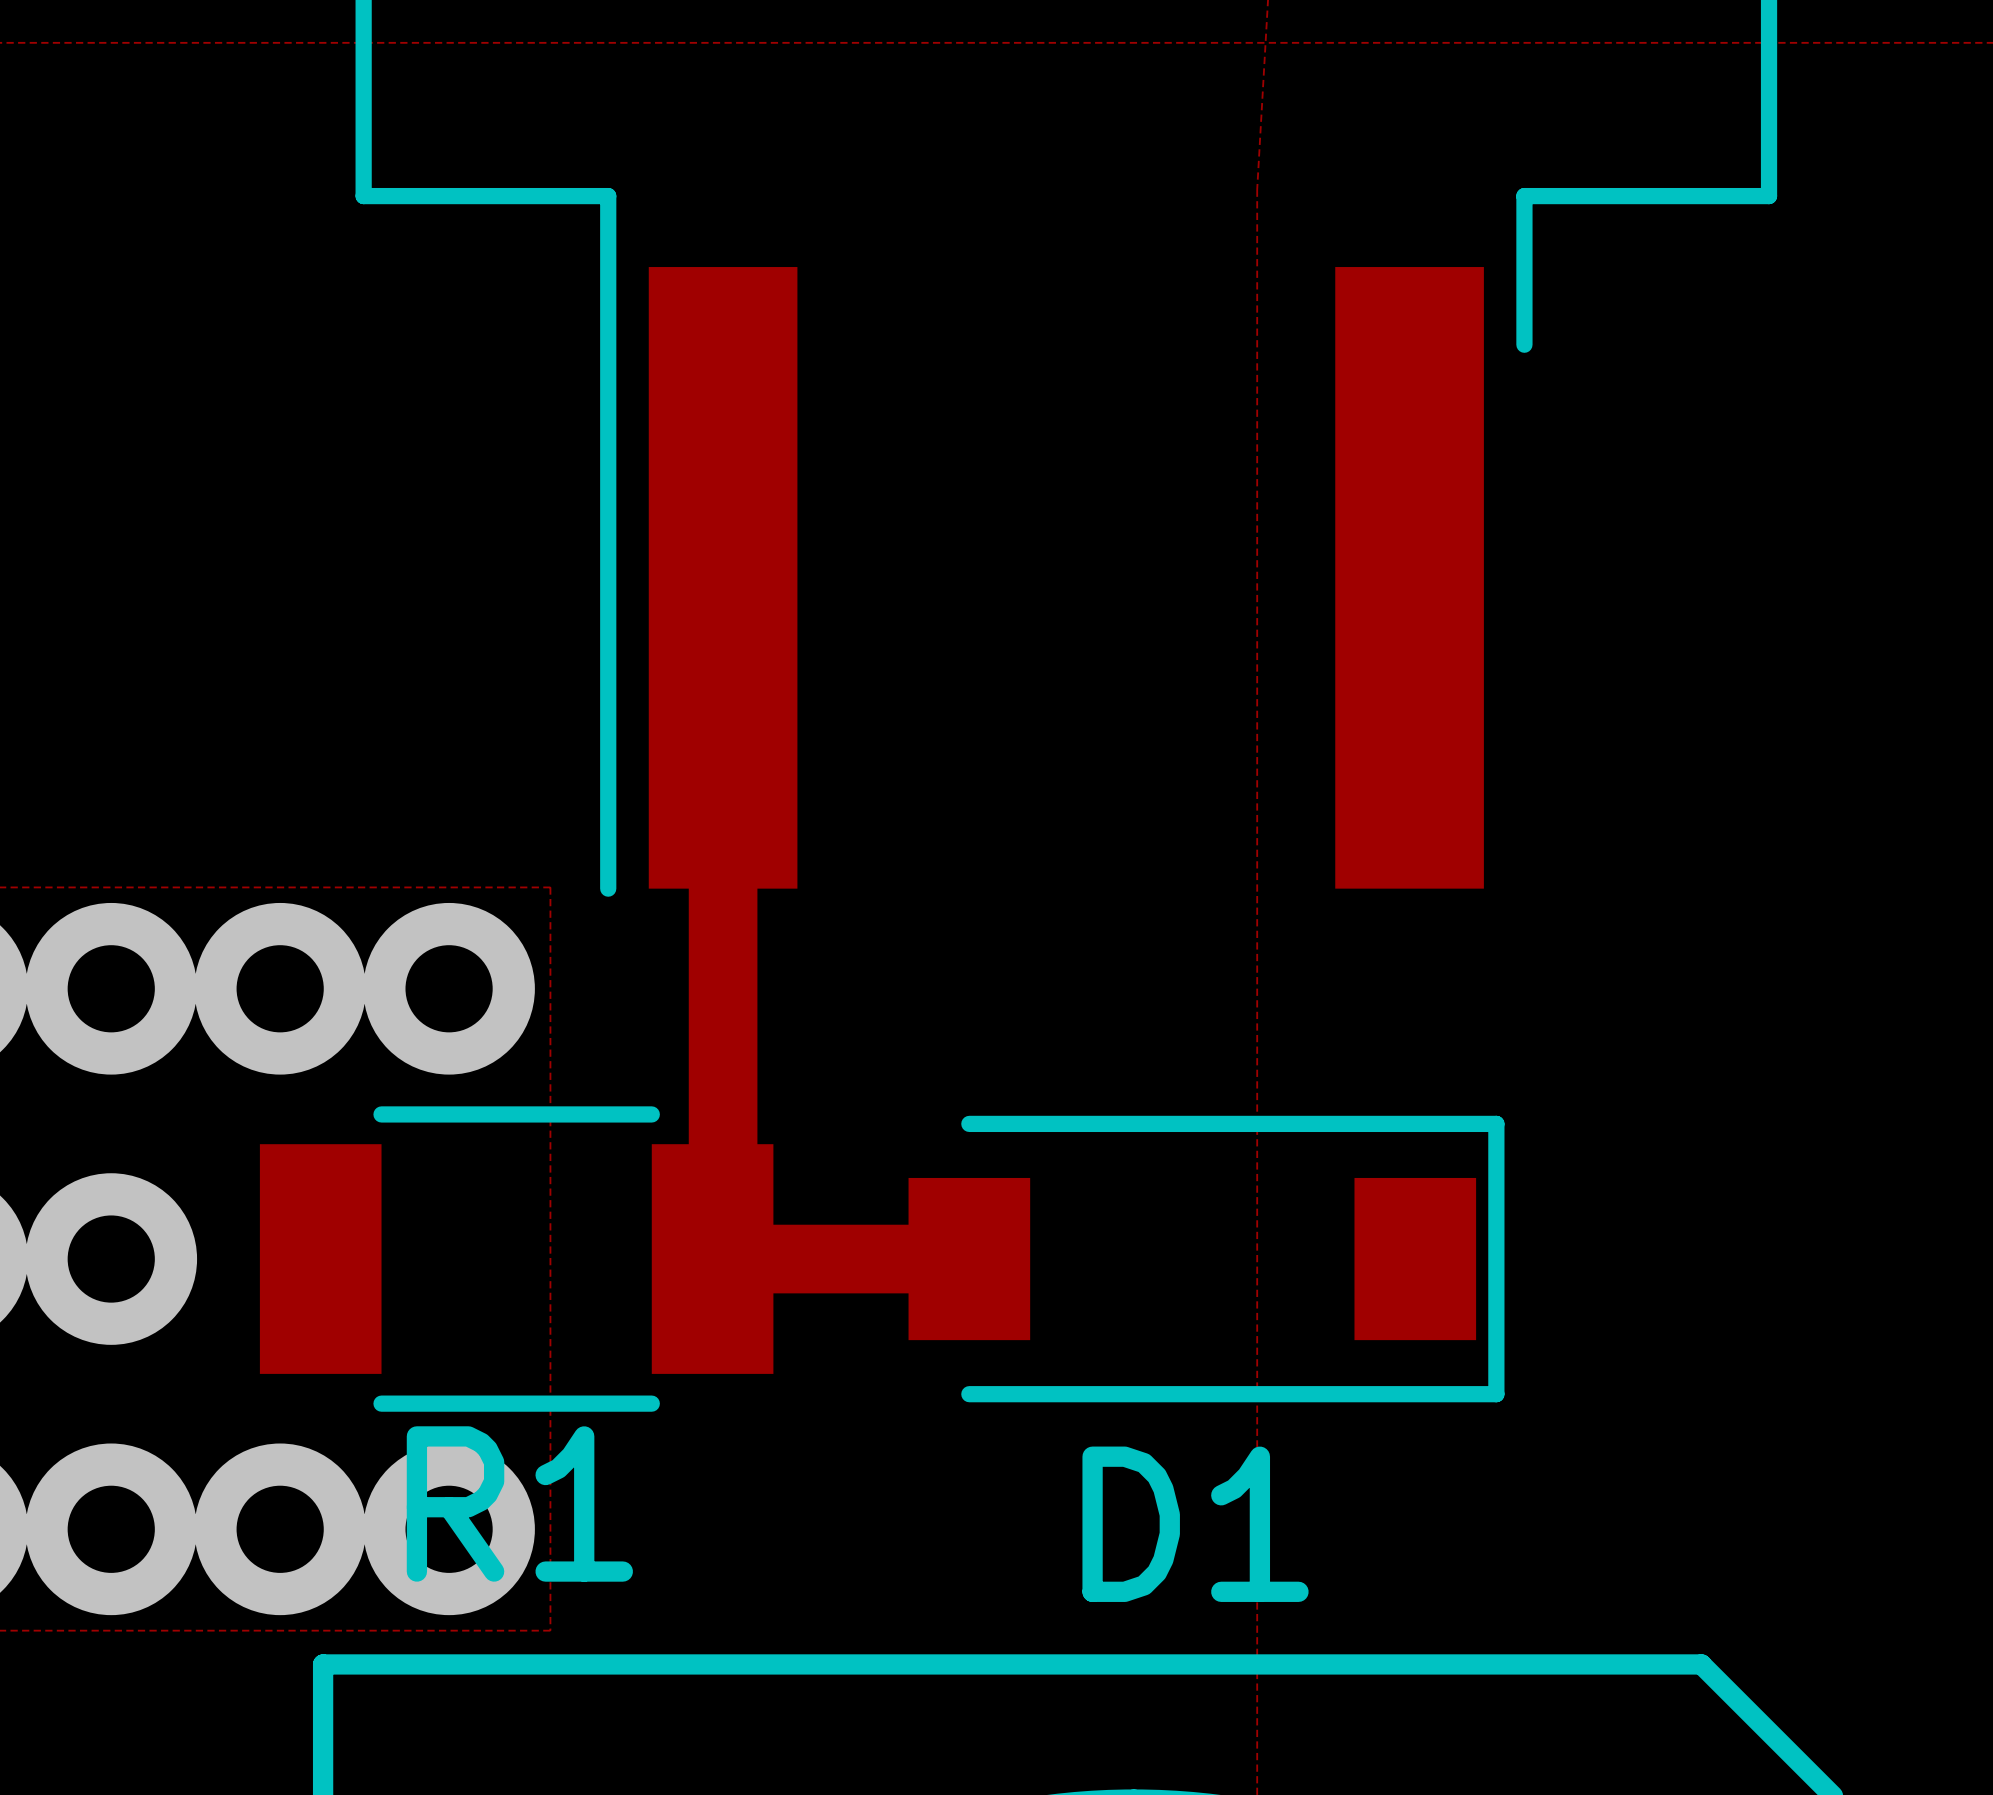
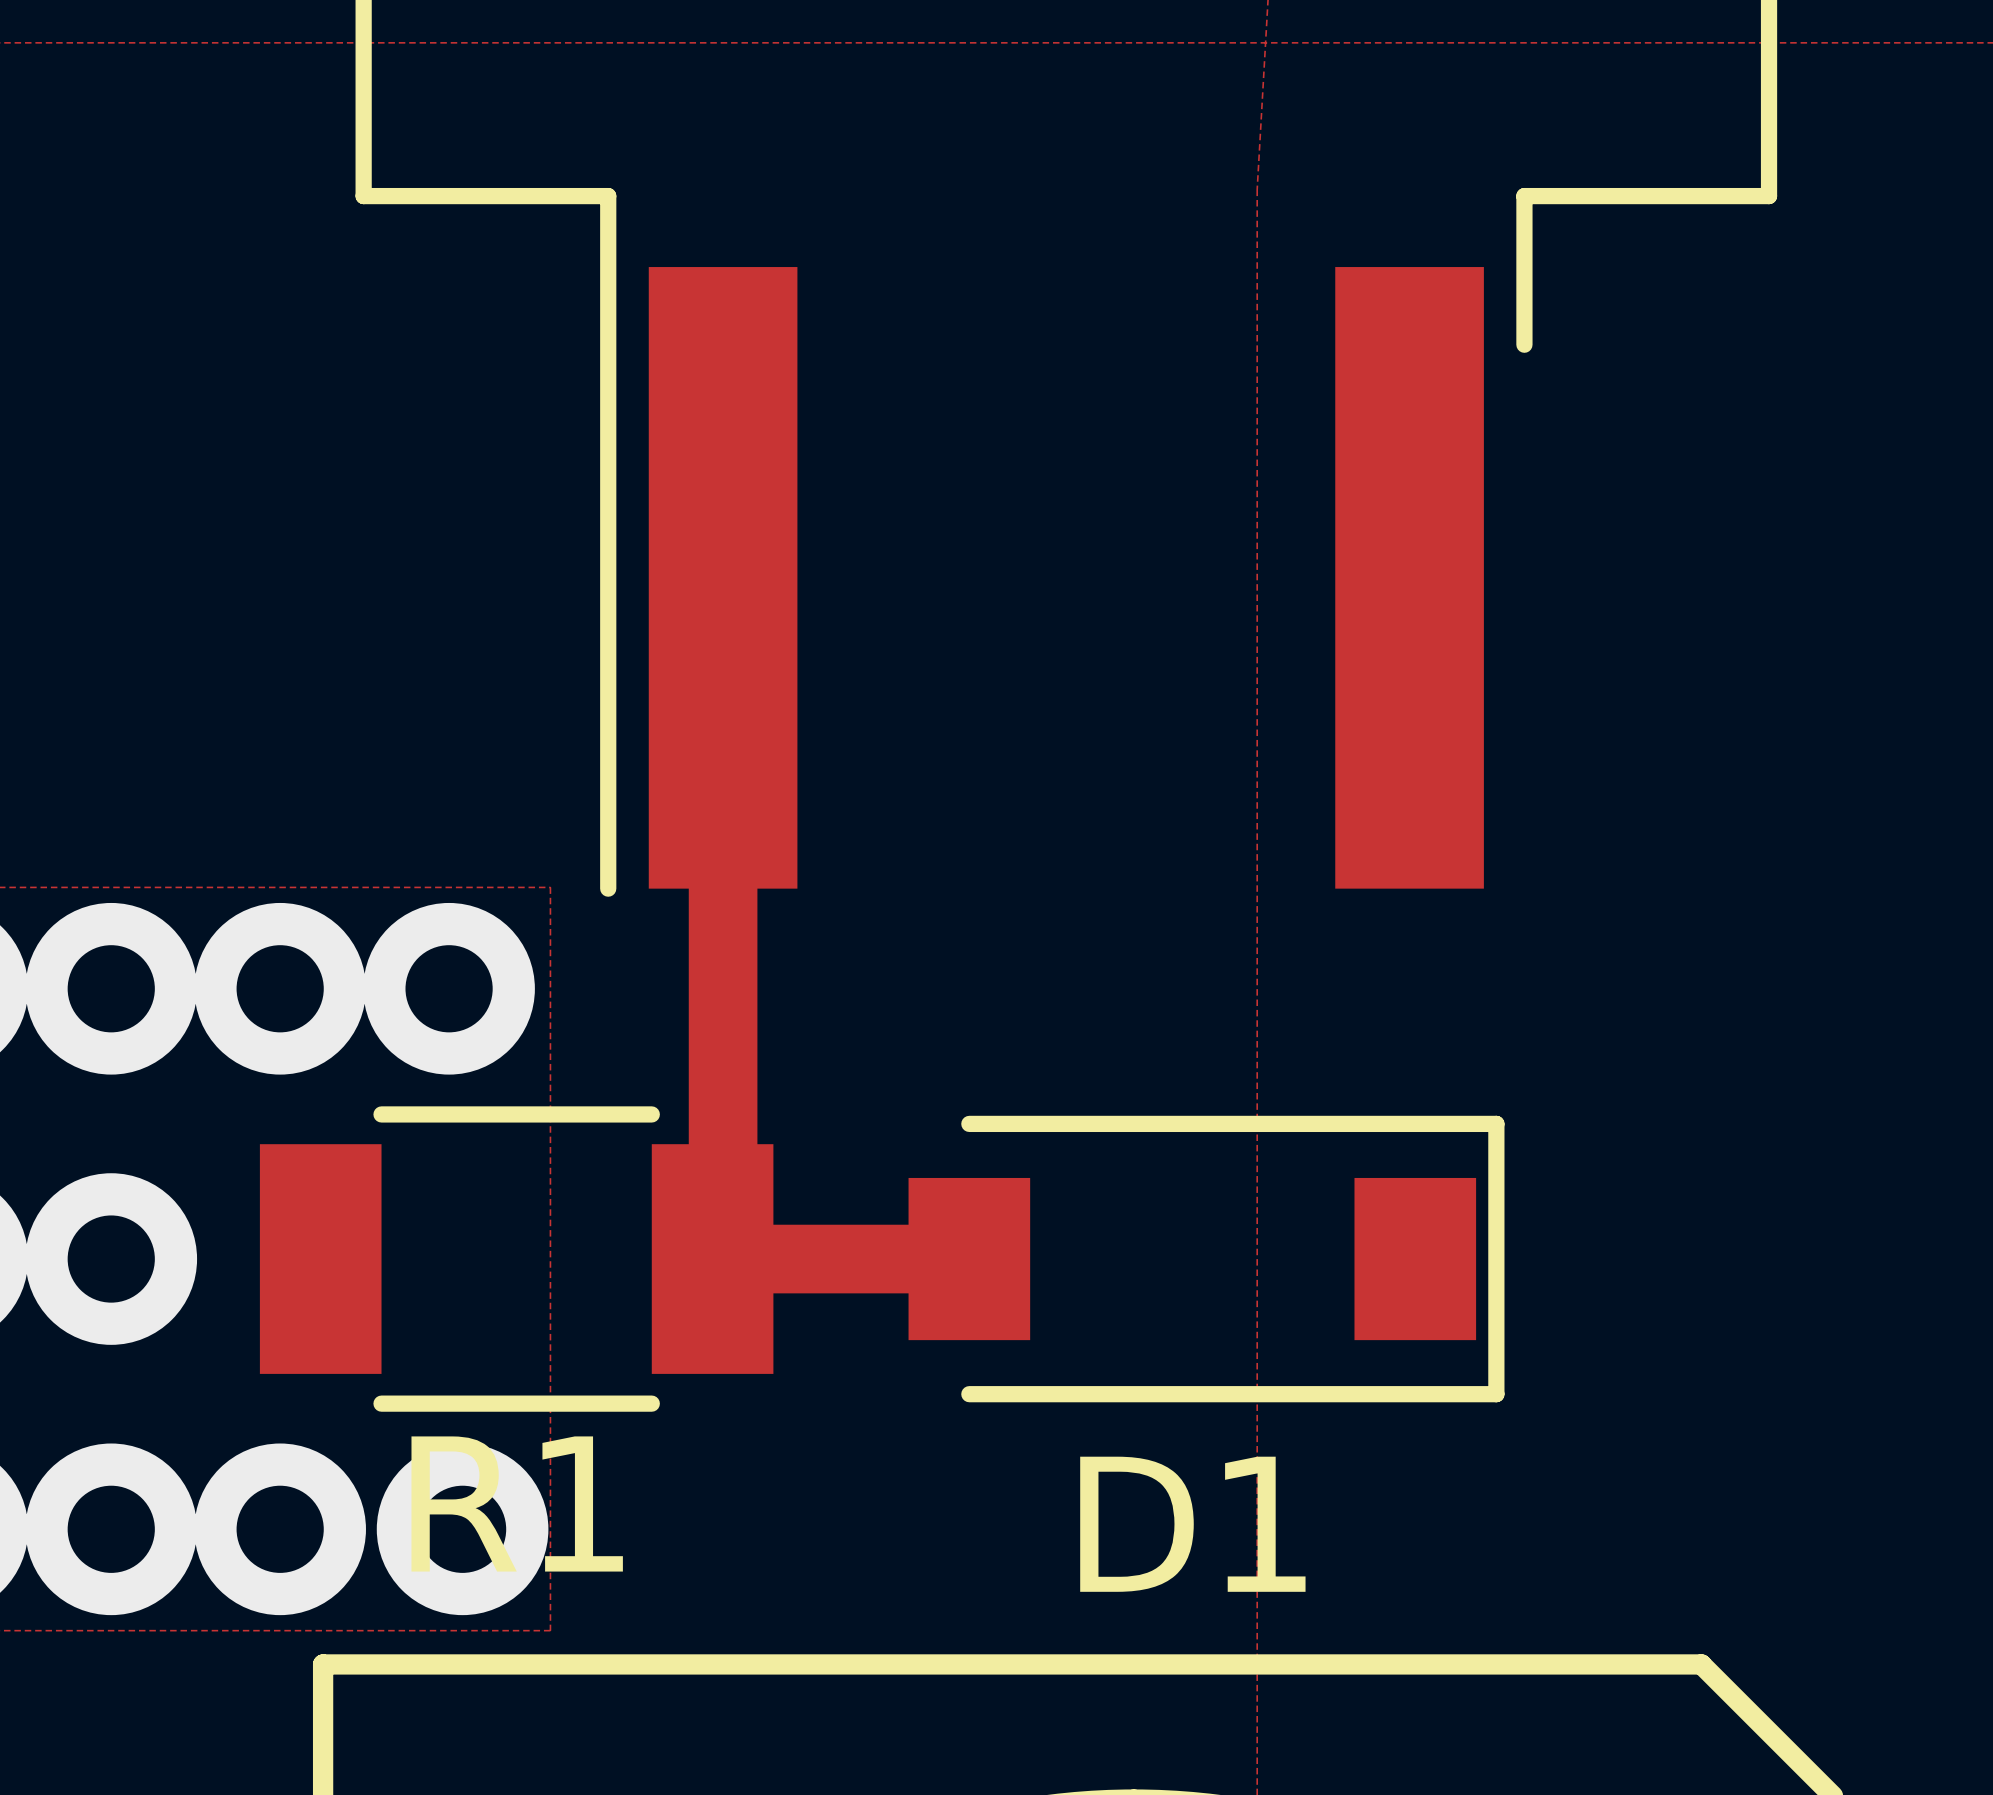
via position: (449, 1529) -> (462, 1529)

